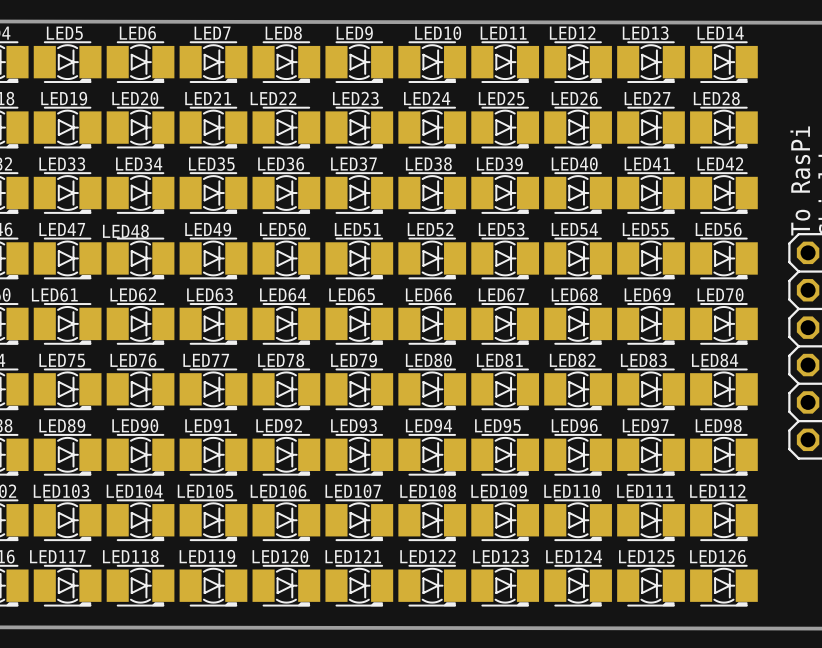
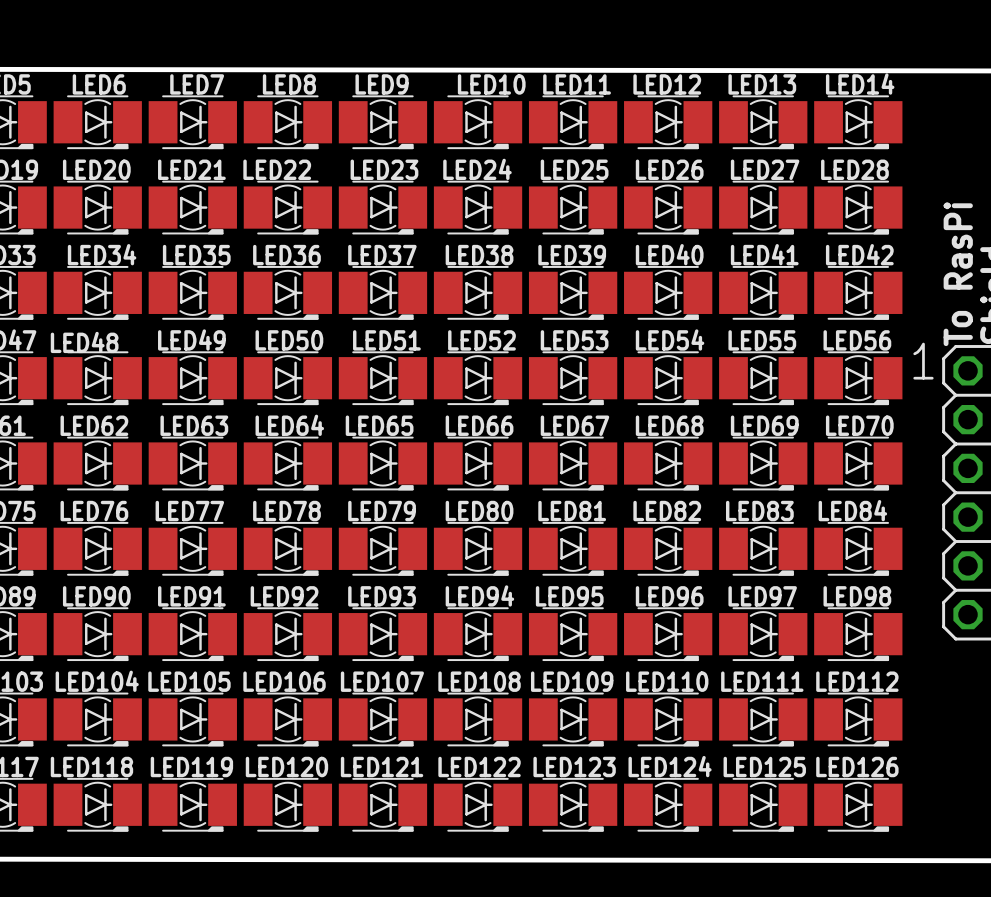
text: none -> 1 (923, 361)

